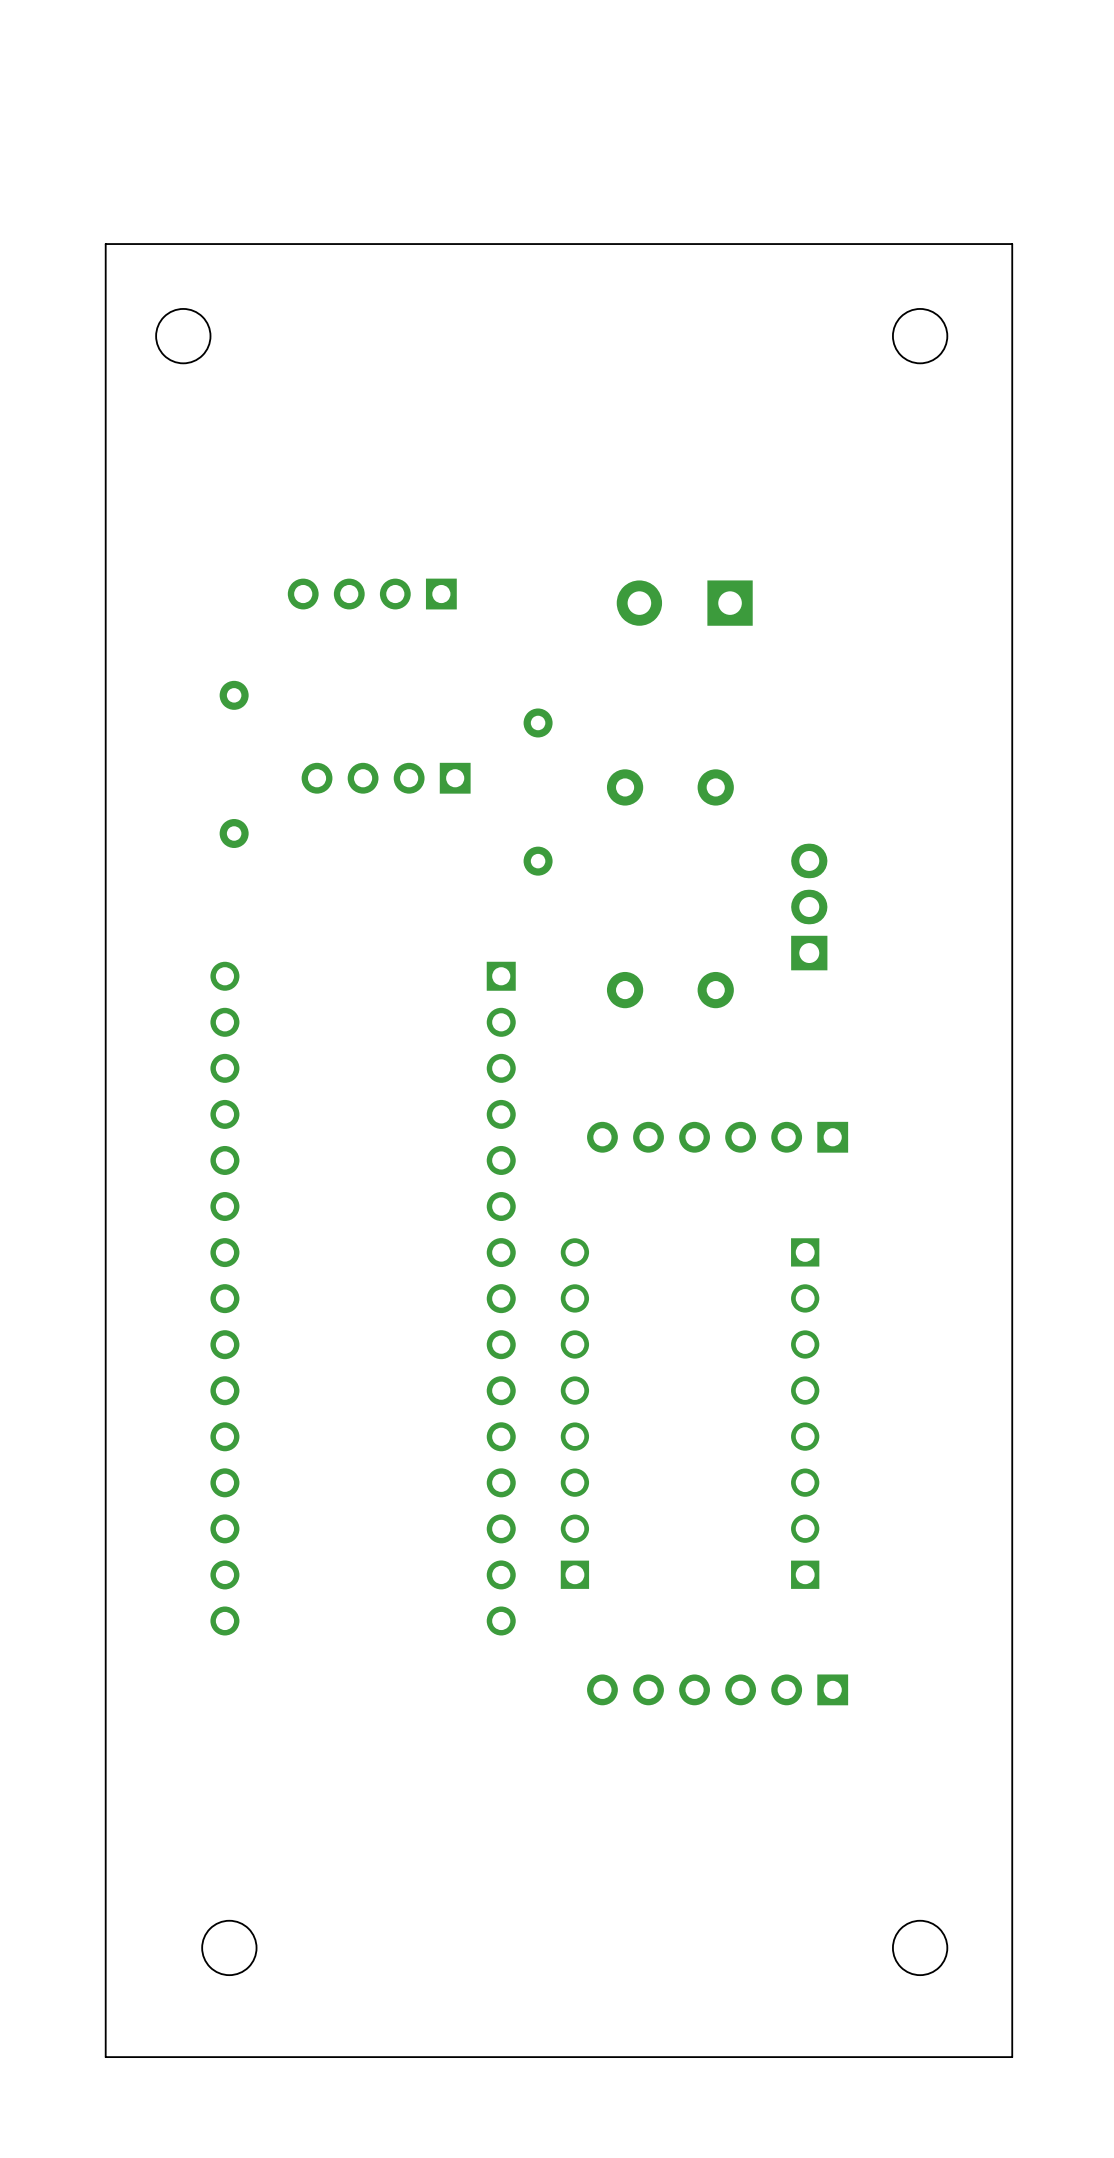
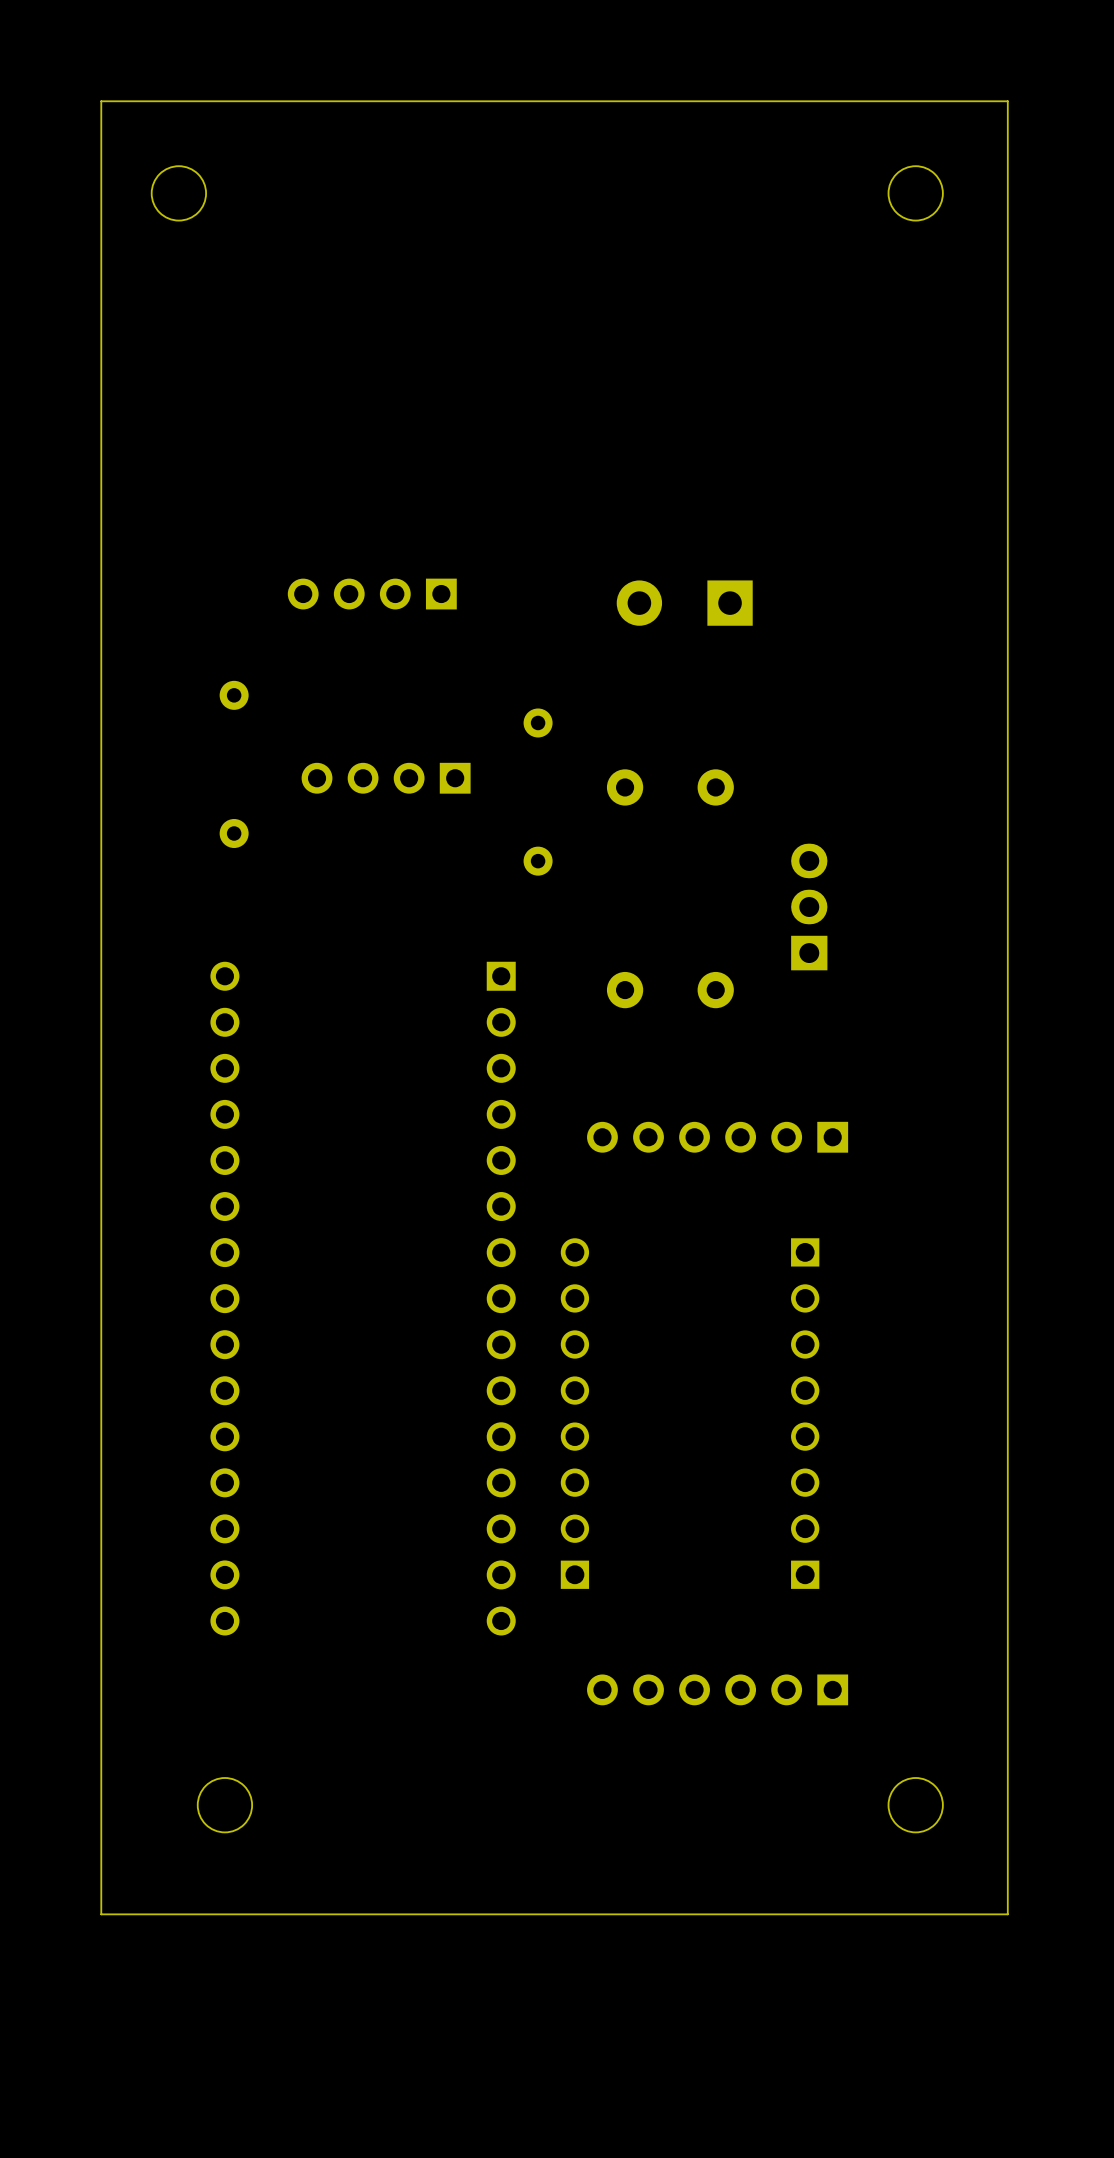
board edge: (1012, 244) (105, 244) (105, 2057) (1012, 2057) (1012, 244) -> (1007, 101) (1007, 1914) (101, 1914) (101, 101) (1007, 101)
round board edge position: (183, 336) -> (178, 193)
round board edge position: (920, 336) -> (915, 193)
round board edge position: (229, 1947) -> (224, 1805)
round board edge position: (920, 1947) -> (915, 1805)

